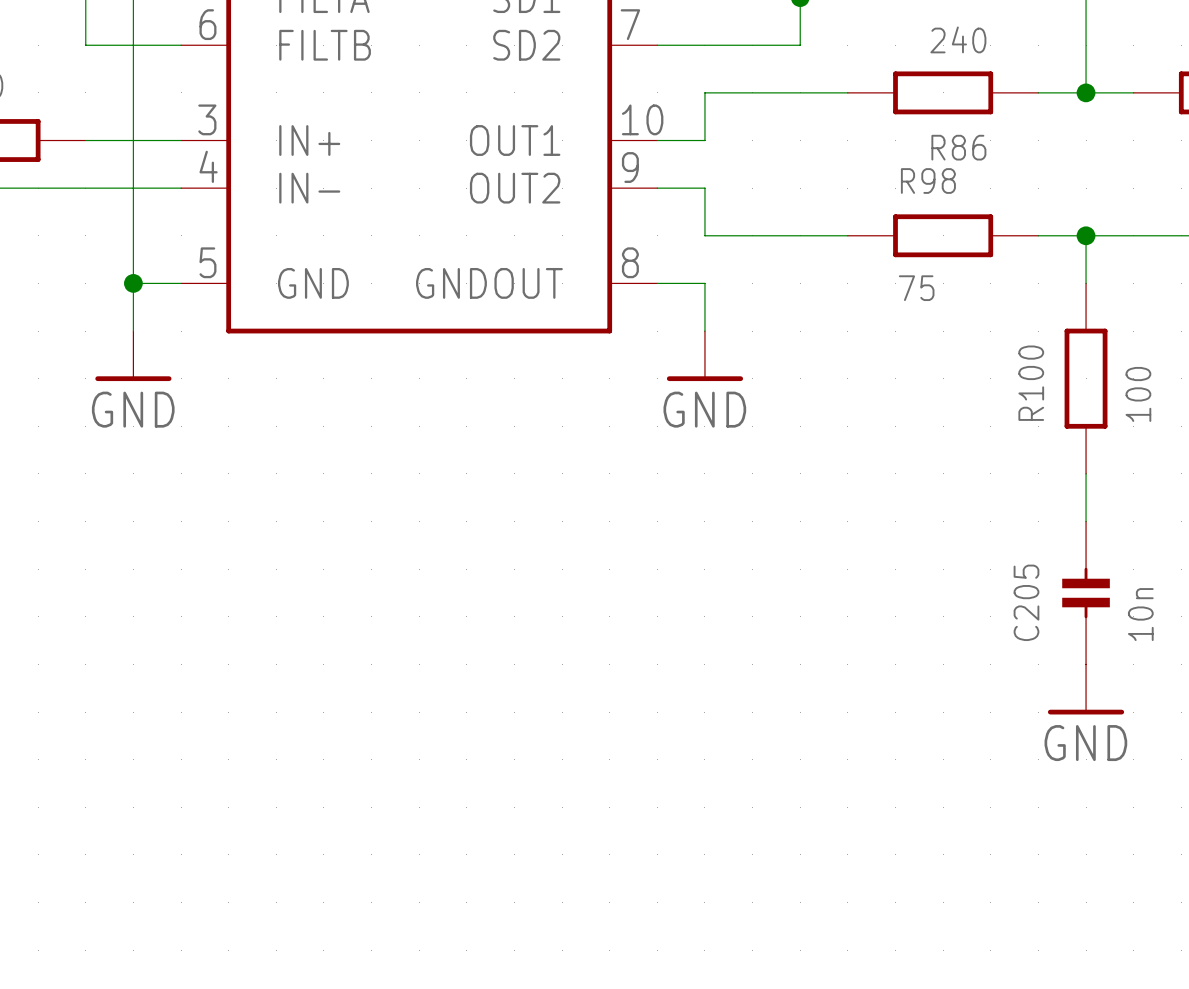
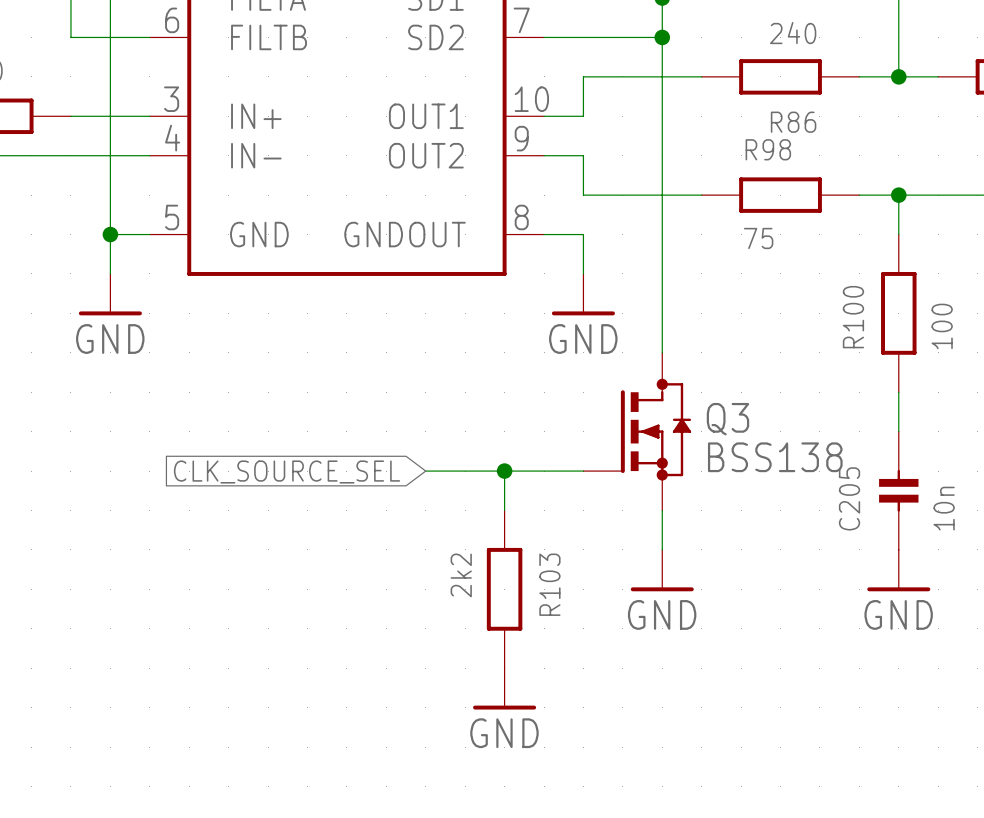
wire: none -> (662, 37) (662, 352)
junction: none -> (662, 37)
Q3: none -> BSS138 (637, 431)
wire: none -> (425, 471) (583, 471)
wire: none -> (504, 471) (504, 510)
junction: none -> (504, 471)
global label: none -> CLK_SOURCE_SEL (287, 472)
wire: none -> (662, 510) (662, 549)
power symbol: none -> GND (662, 570)
R103: none -> 2k2 (504, 589)
power symbol: none -> GND (504, 688)

